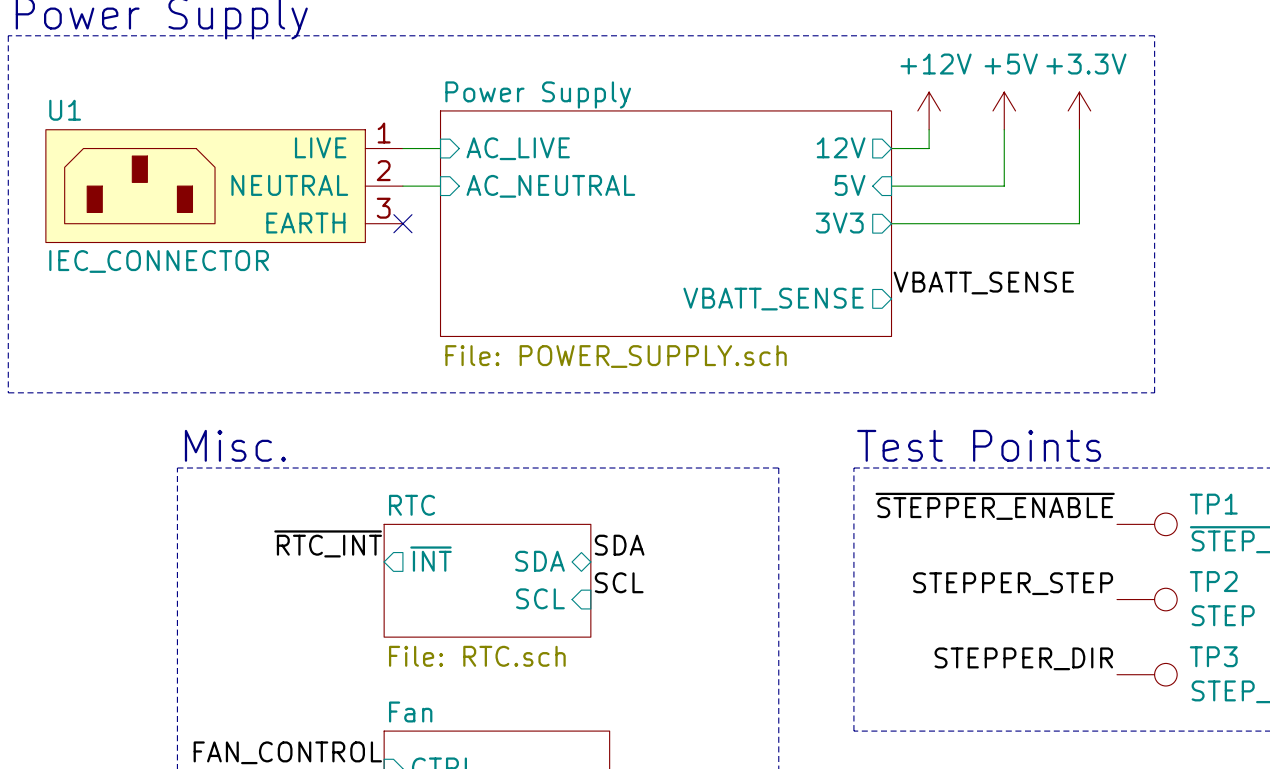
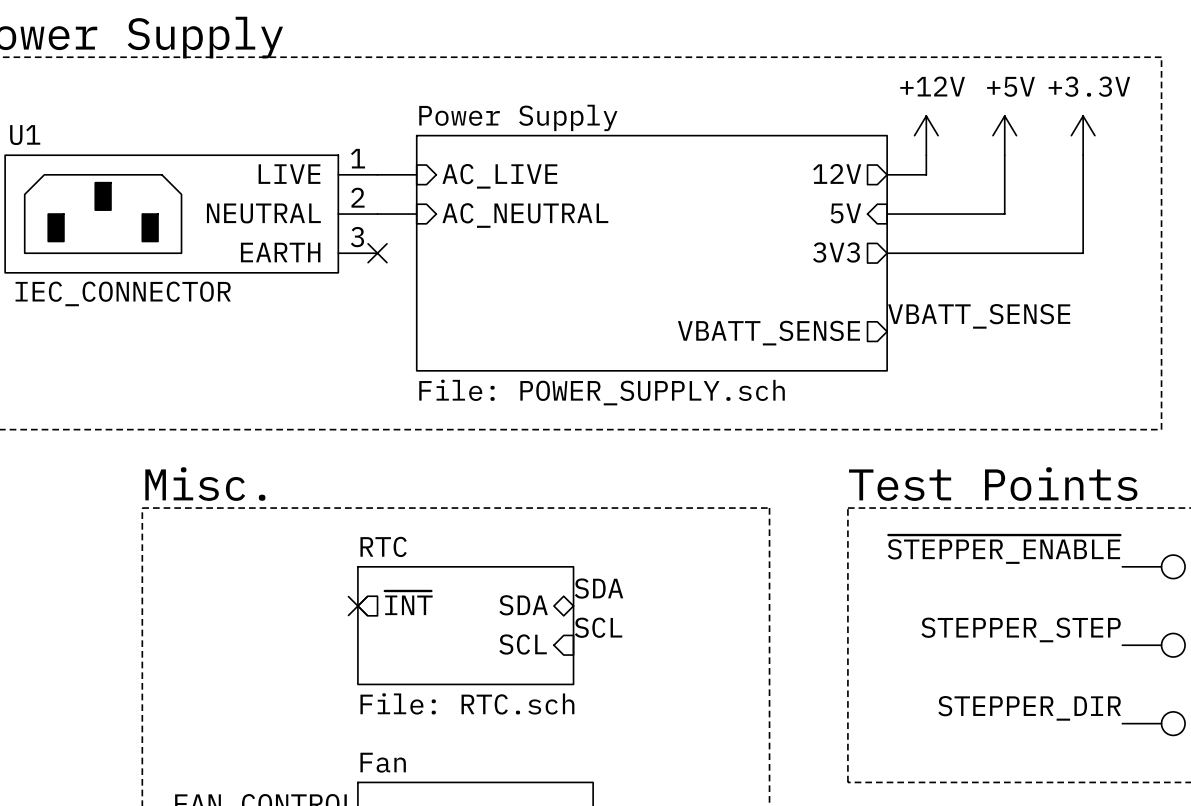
label: ~{RTC_INT} (328, 543) -> none
no-connect mark: none -> (357, 606)

